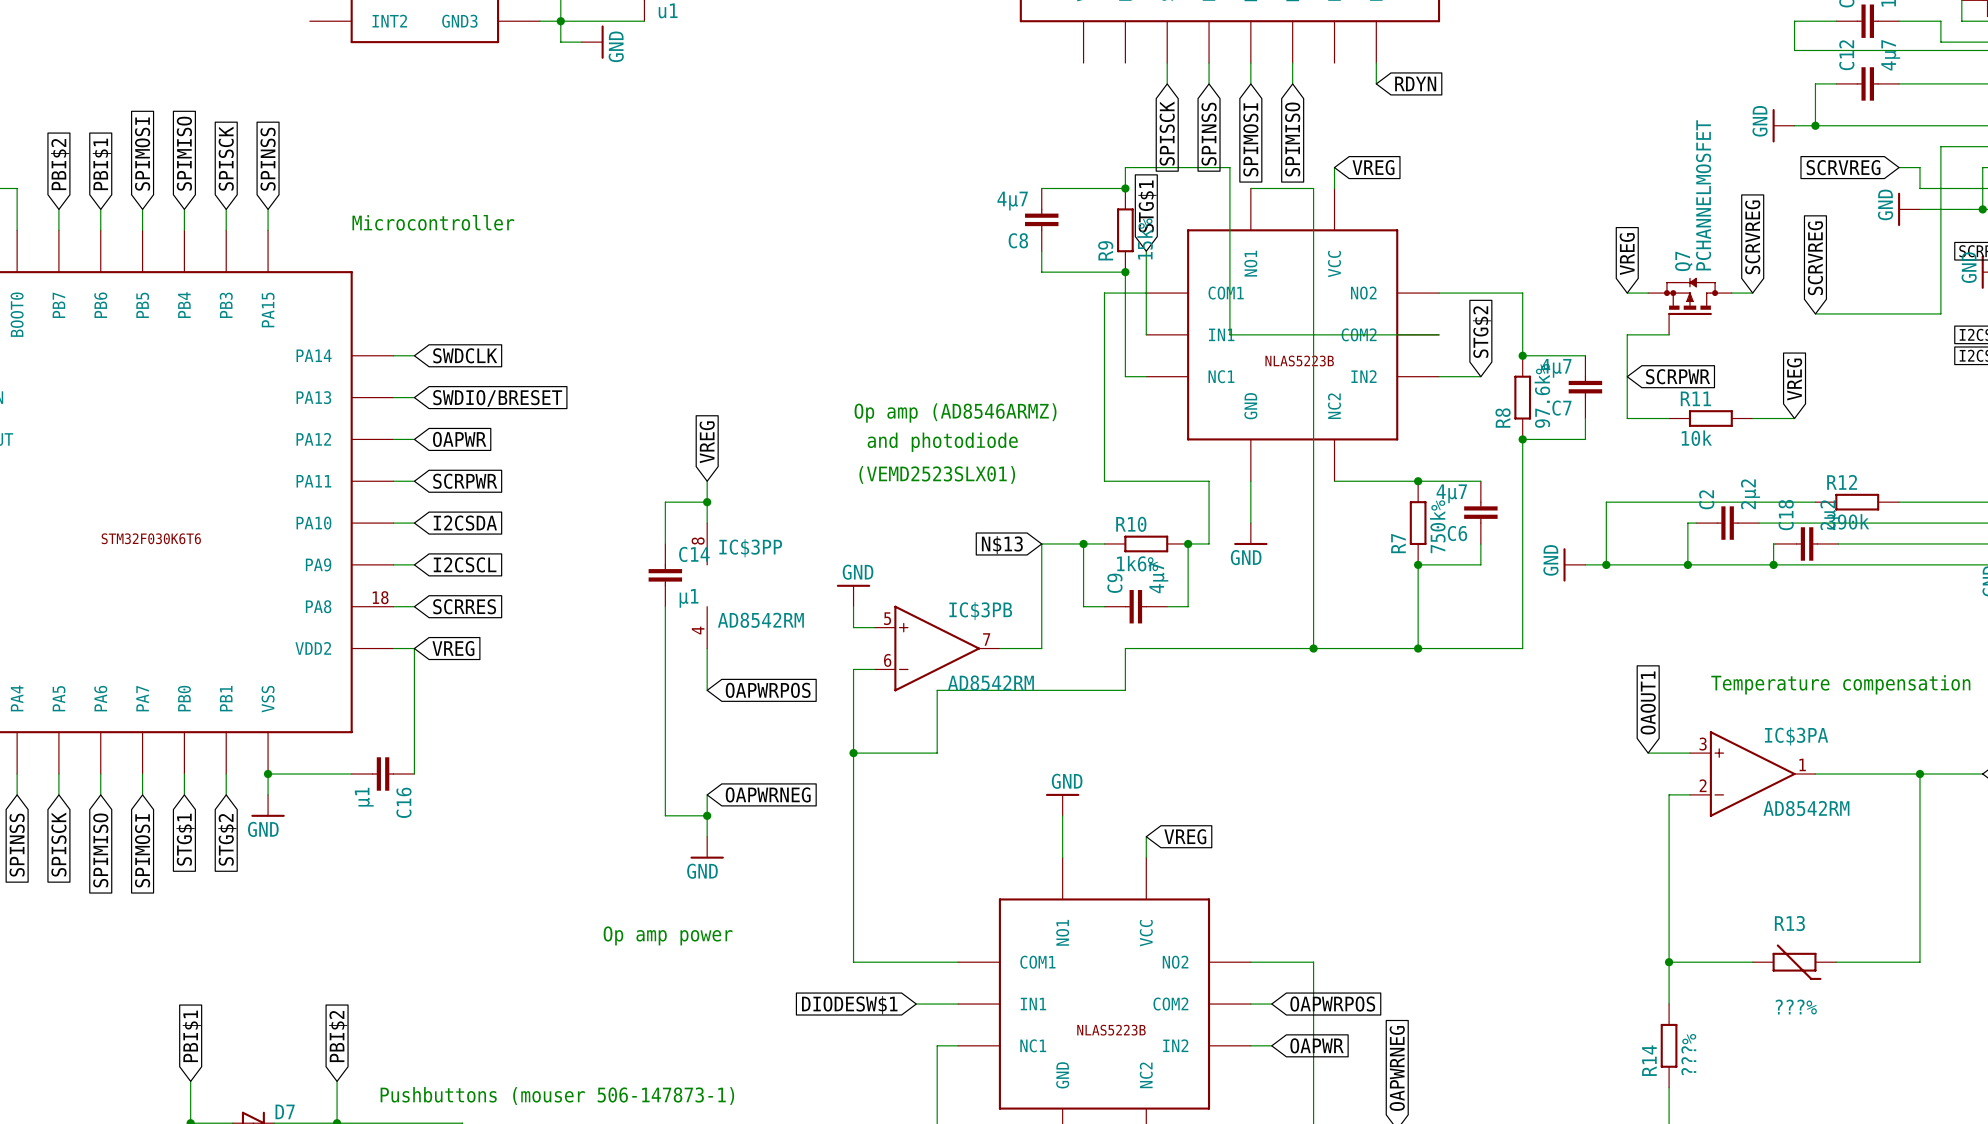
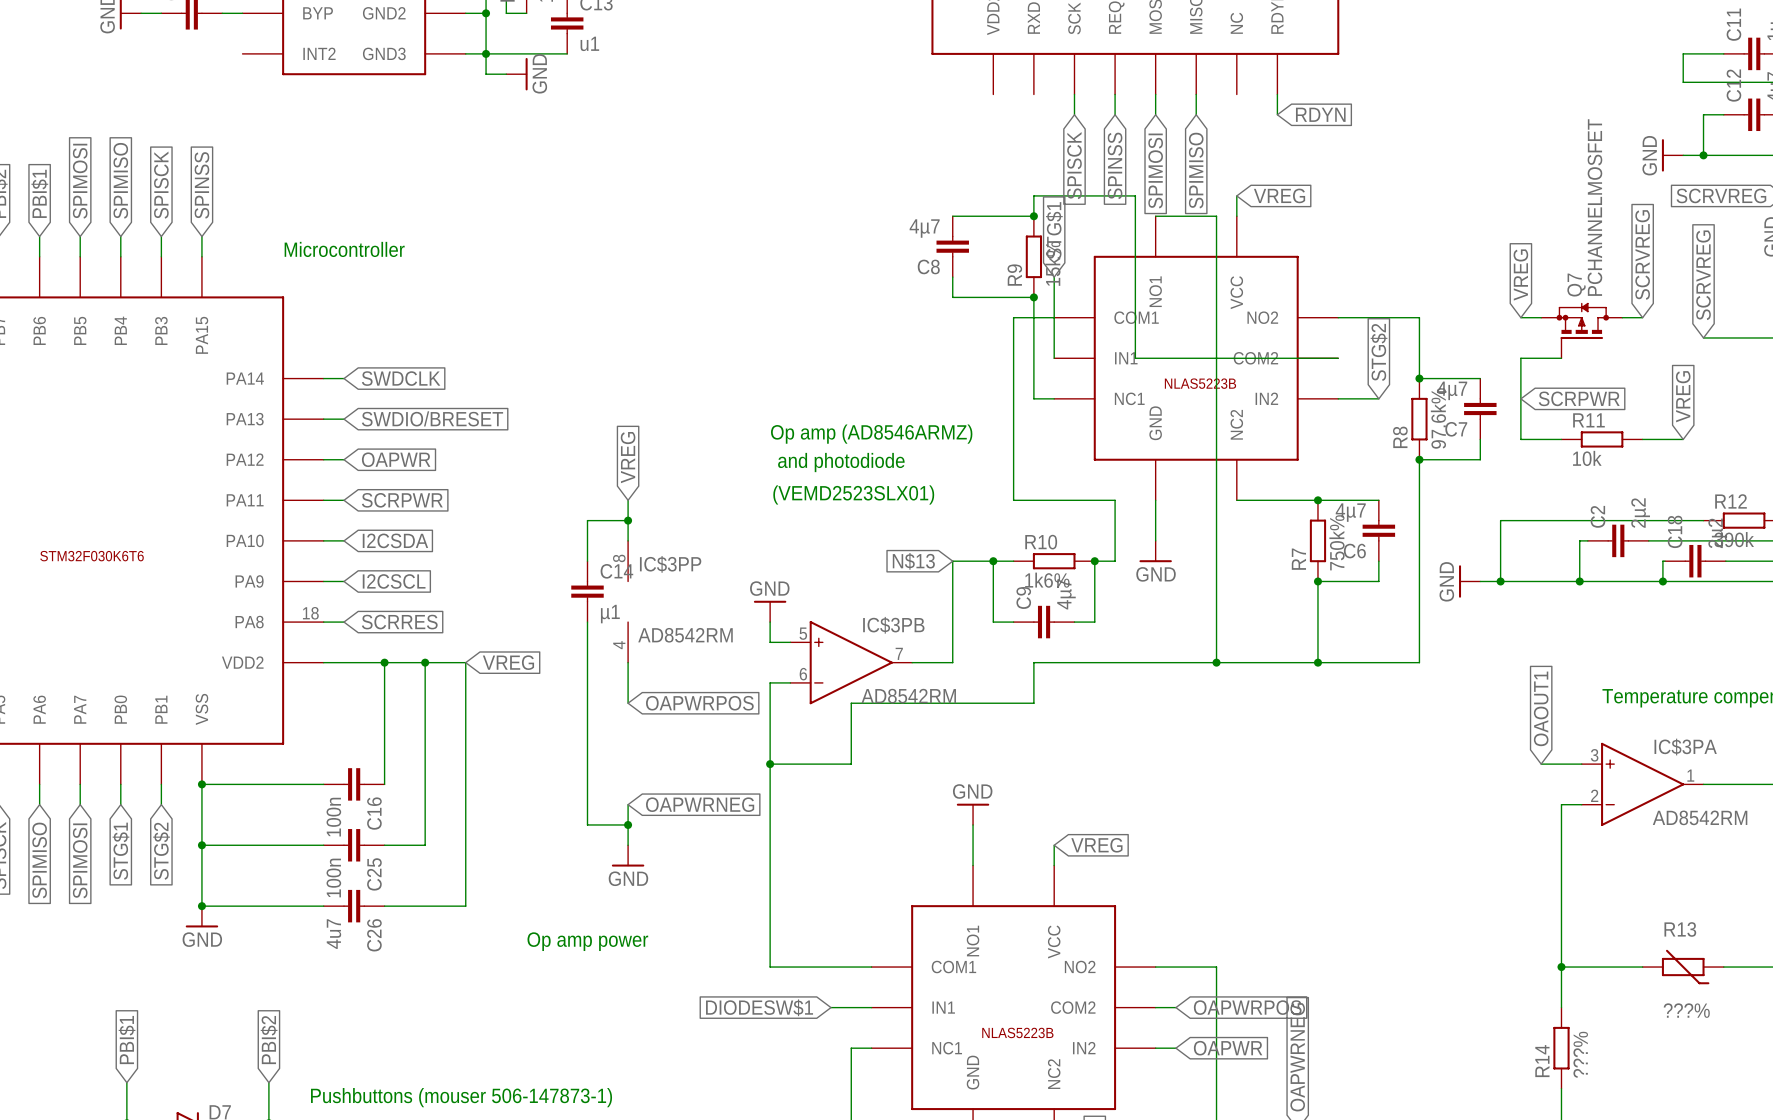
wire: (414, 648) (414, 774) -> (344, 662) (465, 662) (465, 906) (384, 906)
global label position: VREG (453, 648) -> VREG (508, 662)
wire: none -> (384, 662) (384, 784)
junction: none -> (384, 662)
wire: none -> (425, 662) (425, 845) (384, 845)
junction: none -> (425, 662)
C16 position: (383, 774) -> (354, 784)
wire: none -> (201, 804) (201, 906) (323, 906)
C16 value: µ1 (364, 797) -> 100n (333, 817)
power symbol position: GND (268, 805) -> GND (201, 916)
wire: none -> (201, 845) (323, 845)
junction: none -> (201, 845)
C25: none -> 100n (354, 845)
junction: none -> (201, 906)
C26: none -> 4u7 (354, 906)

